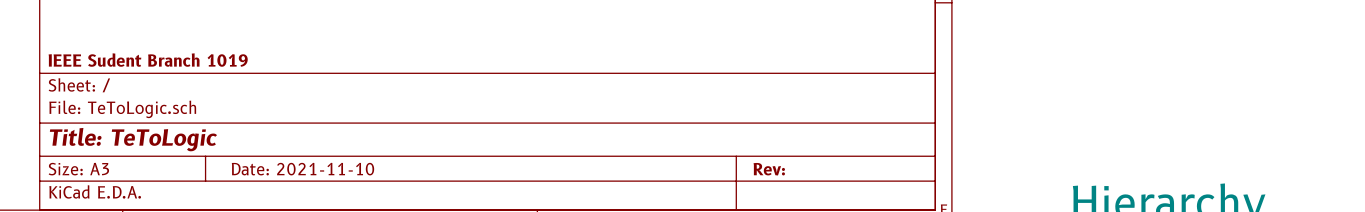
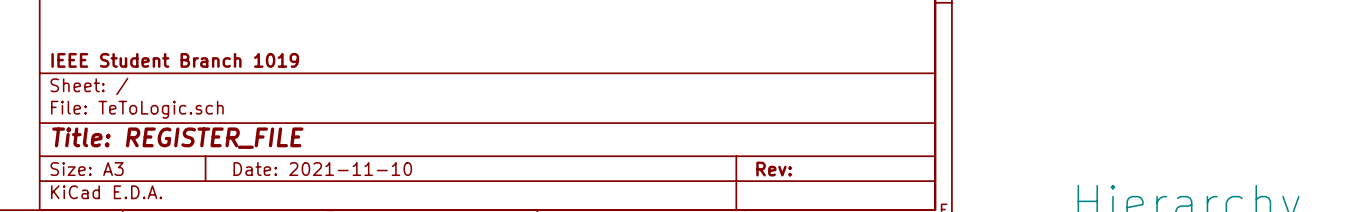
title block: IEEE Sudent Branch 1019 (148, 60) -> IEEE Student Branch 1019 (175, 60)
title block: Title: TeToLogic (133, 139) -> Title: REGISTER_FILE (177, 138)

